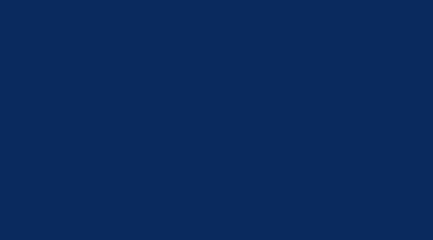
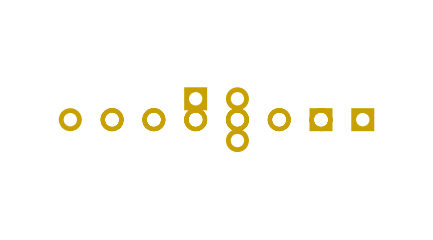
part: none -> (216, 119)
part: none -> (216, 119)
part: none -> (216, 119)

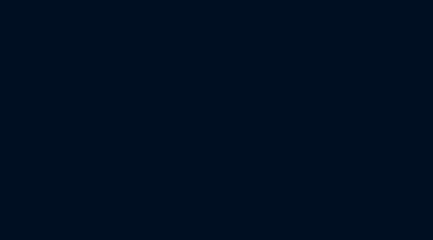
part: (216, 119) -> none
part: (216, 119) -> none
part: (216, 119) -> none

